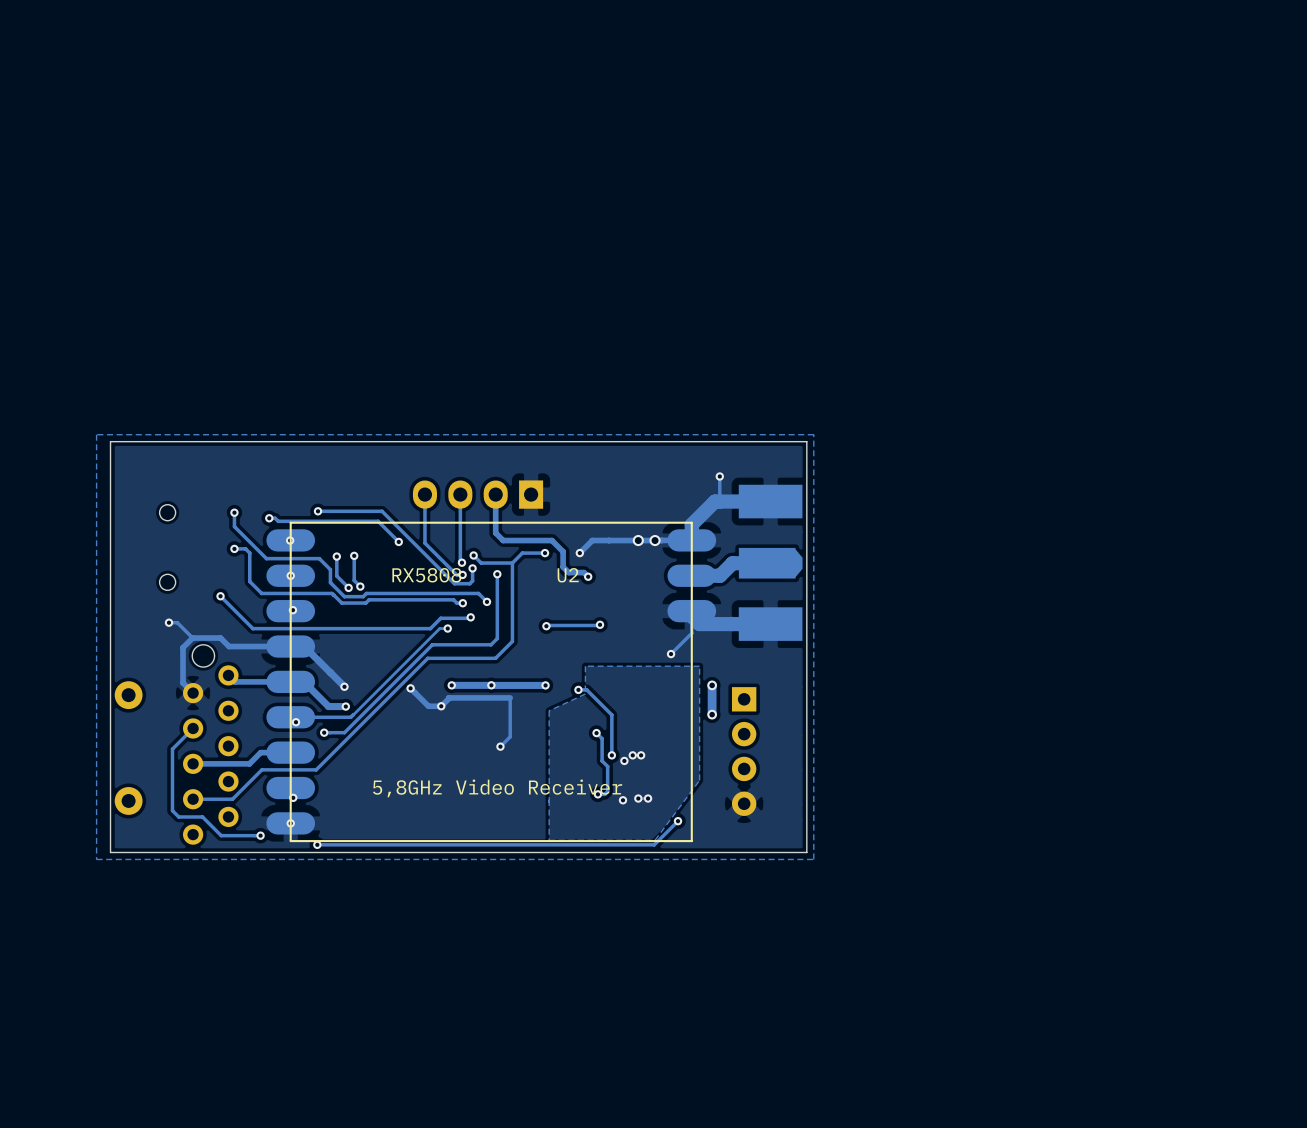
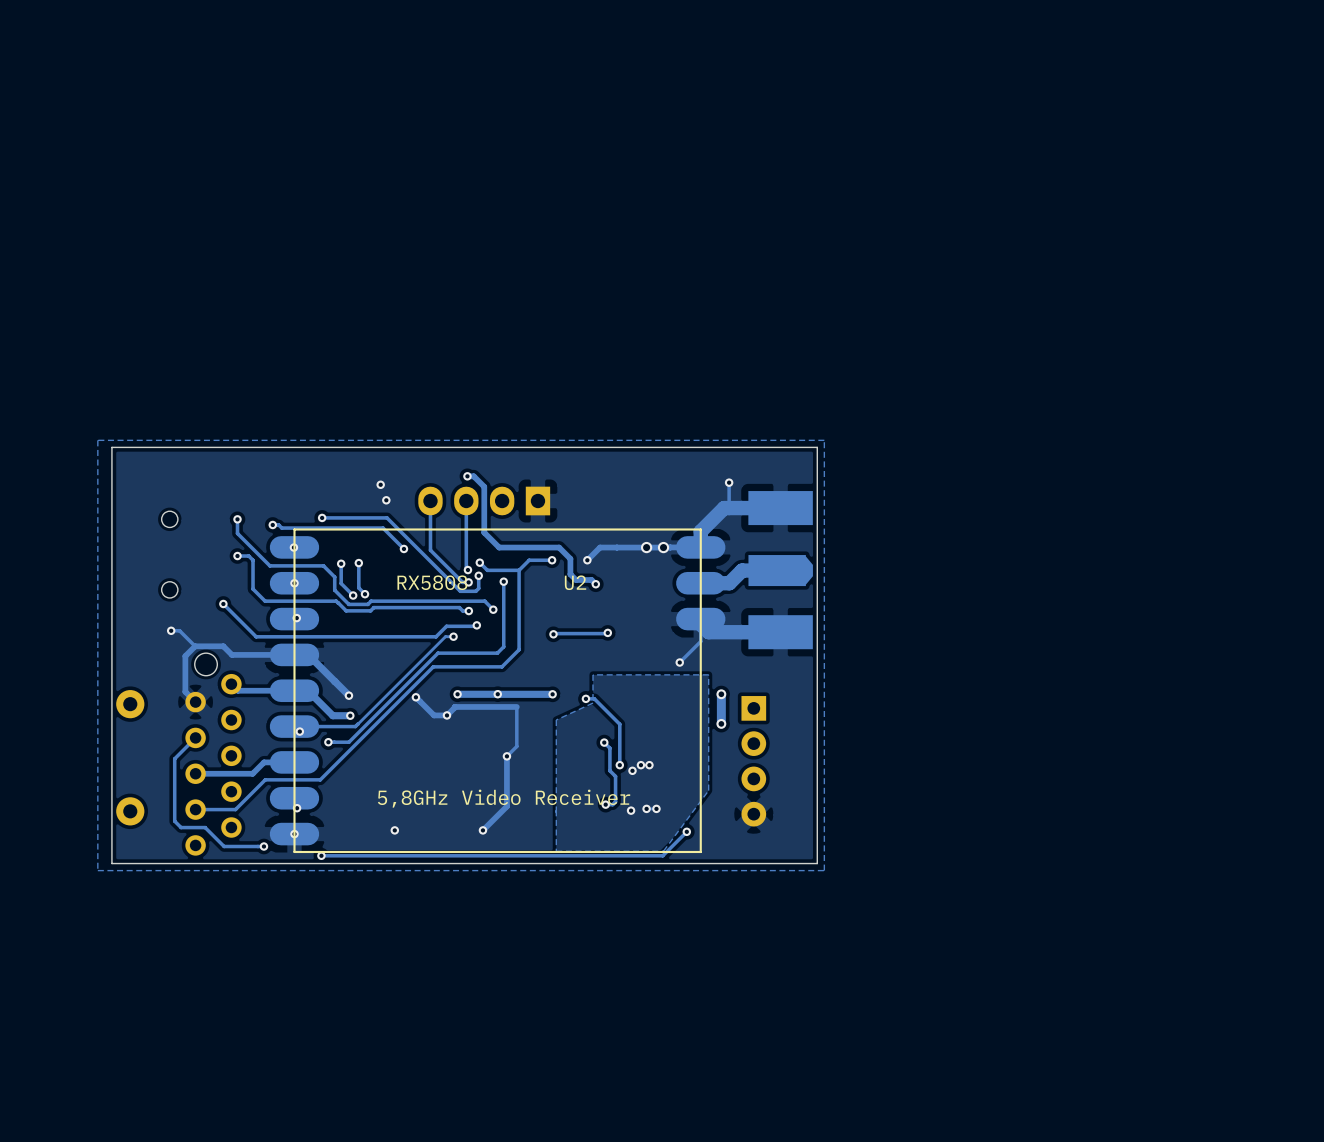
via: none -> (467, 476)
via: none -> (380, 484)
via: none -> (386, 500)
track: (495, 501) (495, 533) (503, 540) -> (467, 476) (473, 476) (484, 486) (484, 532) (499, 547) (509, 547)
track: none -> (506, 756) (506, 806) (482, 830)
via: none -> (394, 830)
via: none -> (482, 830)

